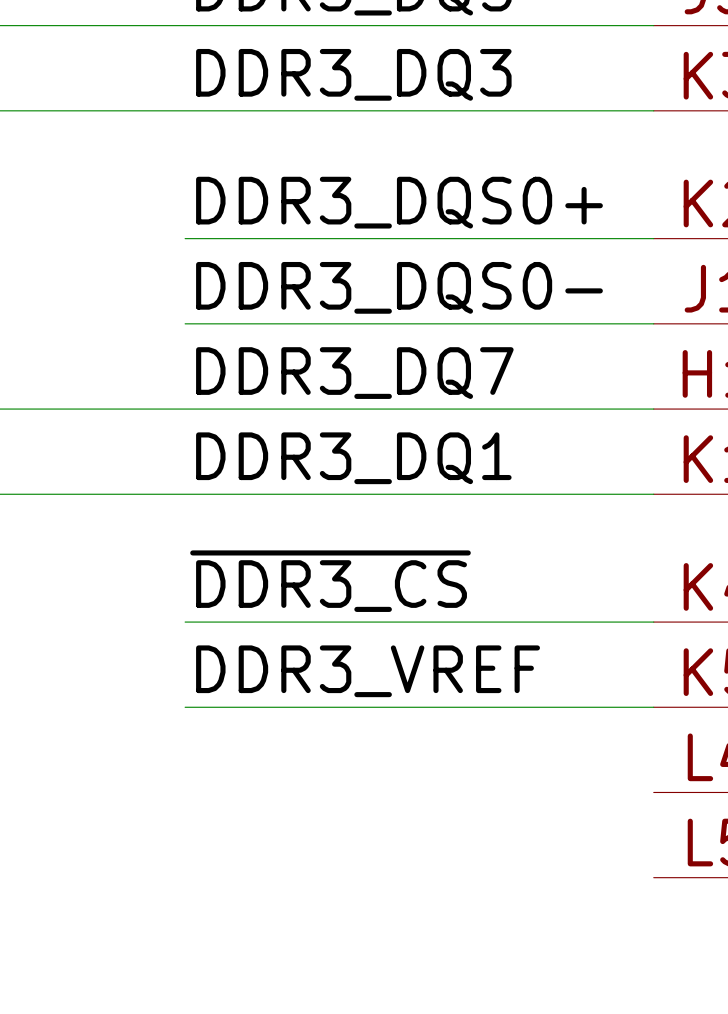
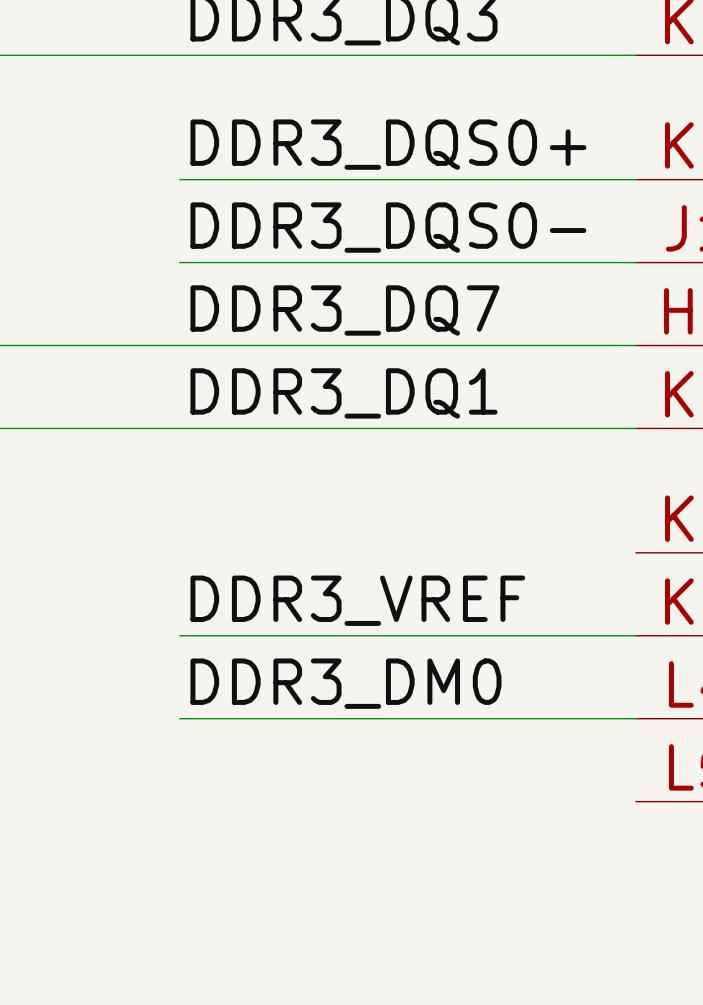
label: ~{DDR3_CS} (330, 581) -> none
wire: (185, 622) (653, 622) -> (179, 718) (635, 718)
label: none -> DDR3_DM0 (345, 683)

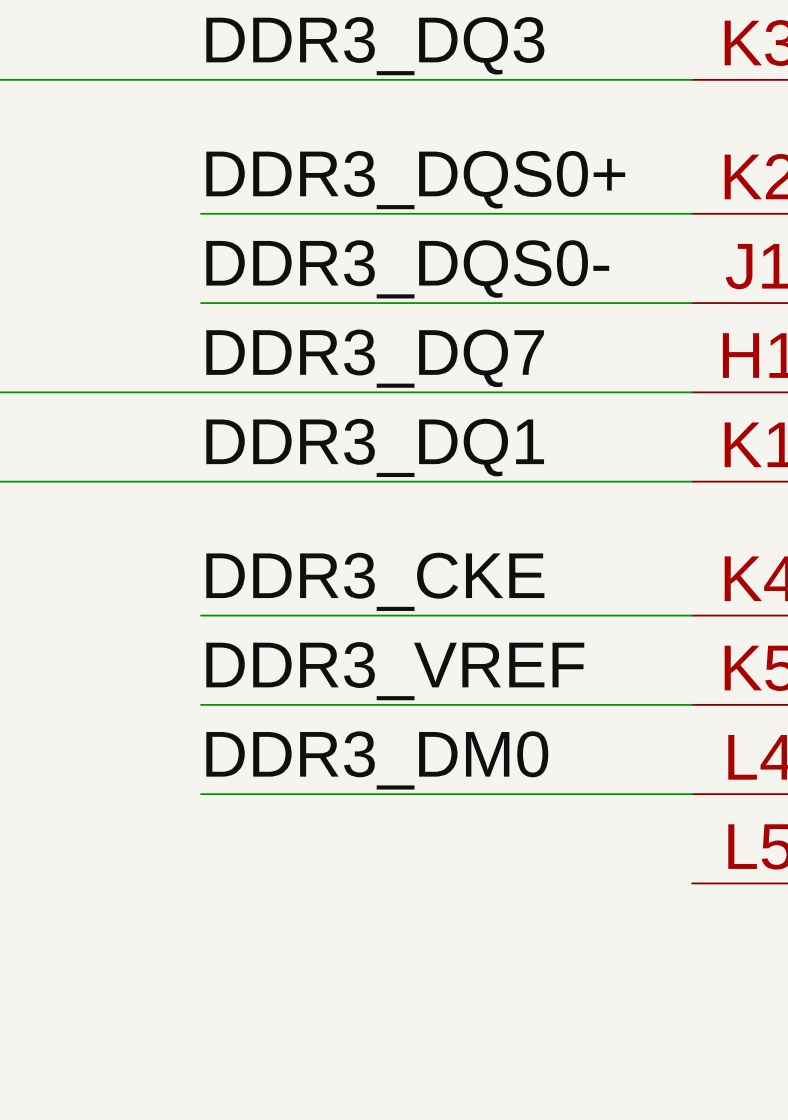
label: none -> DDR3_CKE (375, 581)
wire: none -> (201, 615) (692, 615)

